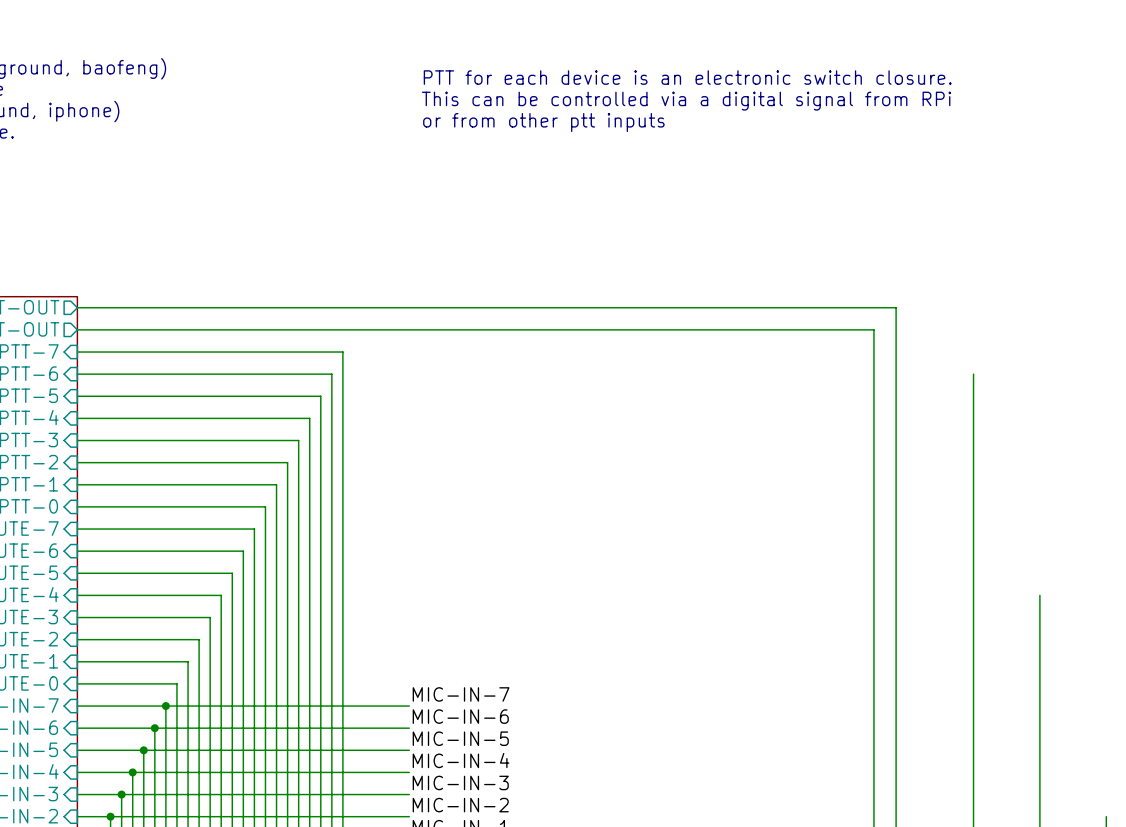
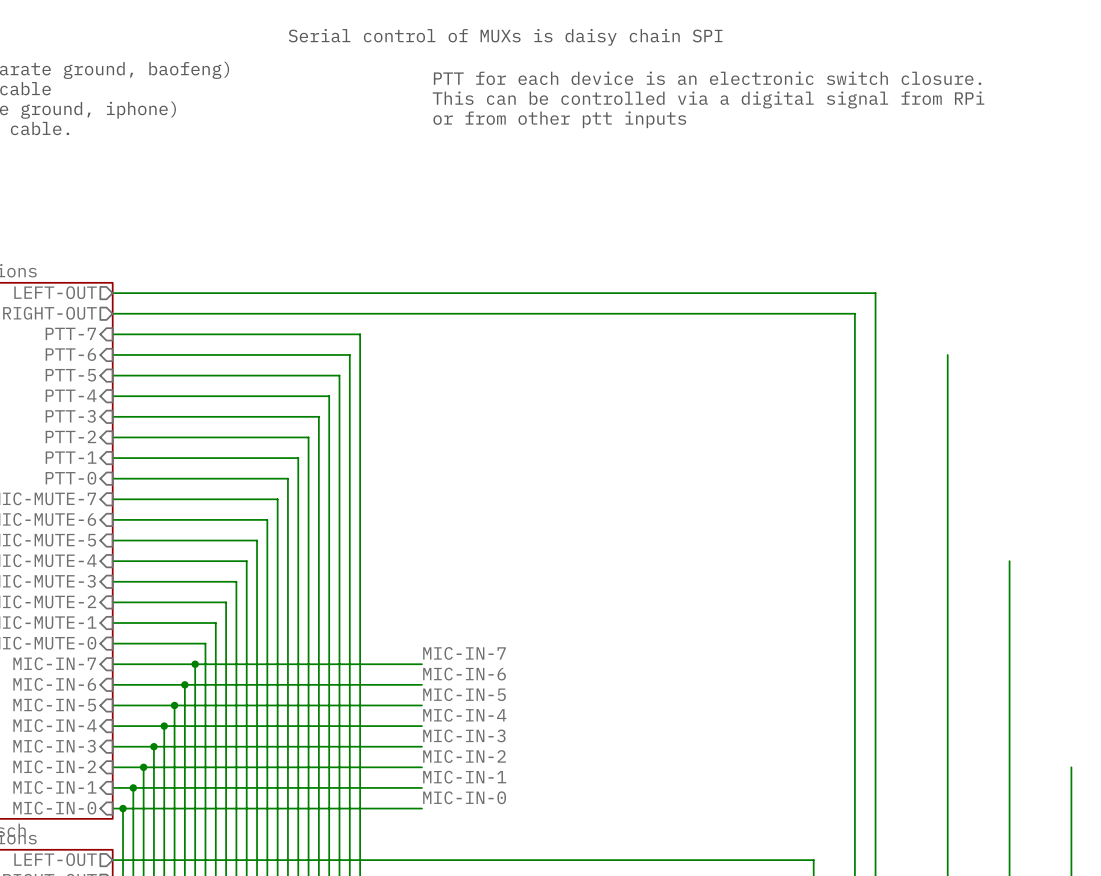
text: none -> Serial control of MUXs is daisy chain SPI (505, 37)

